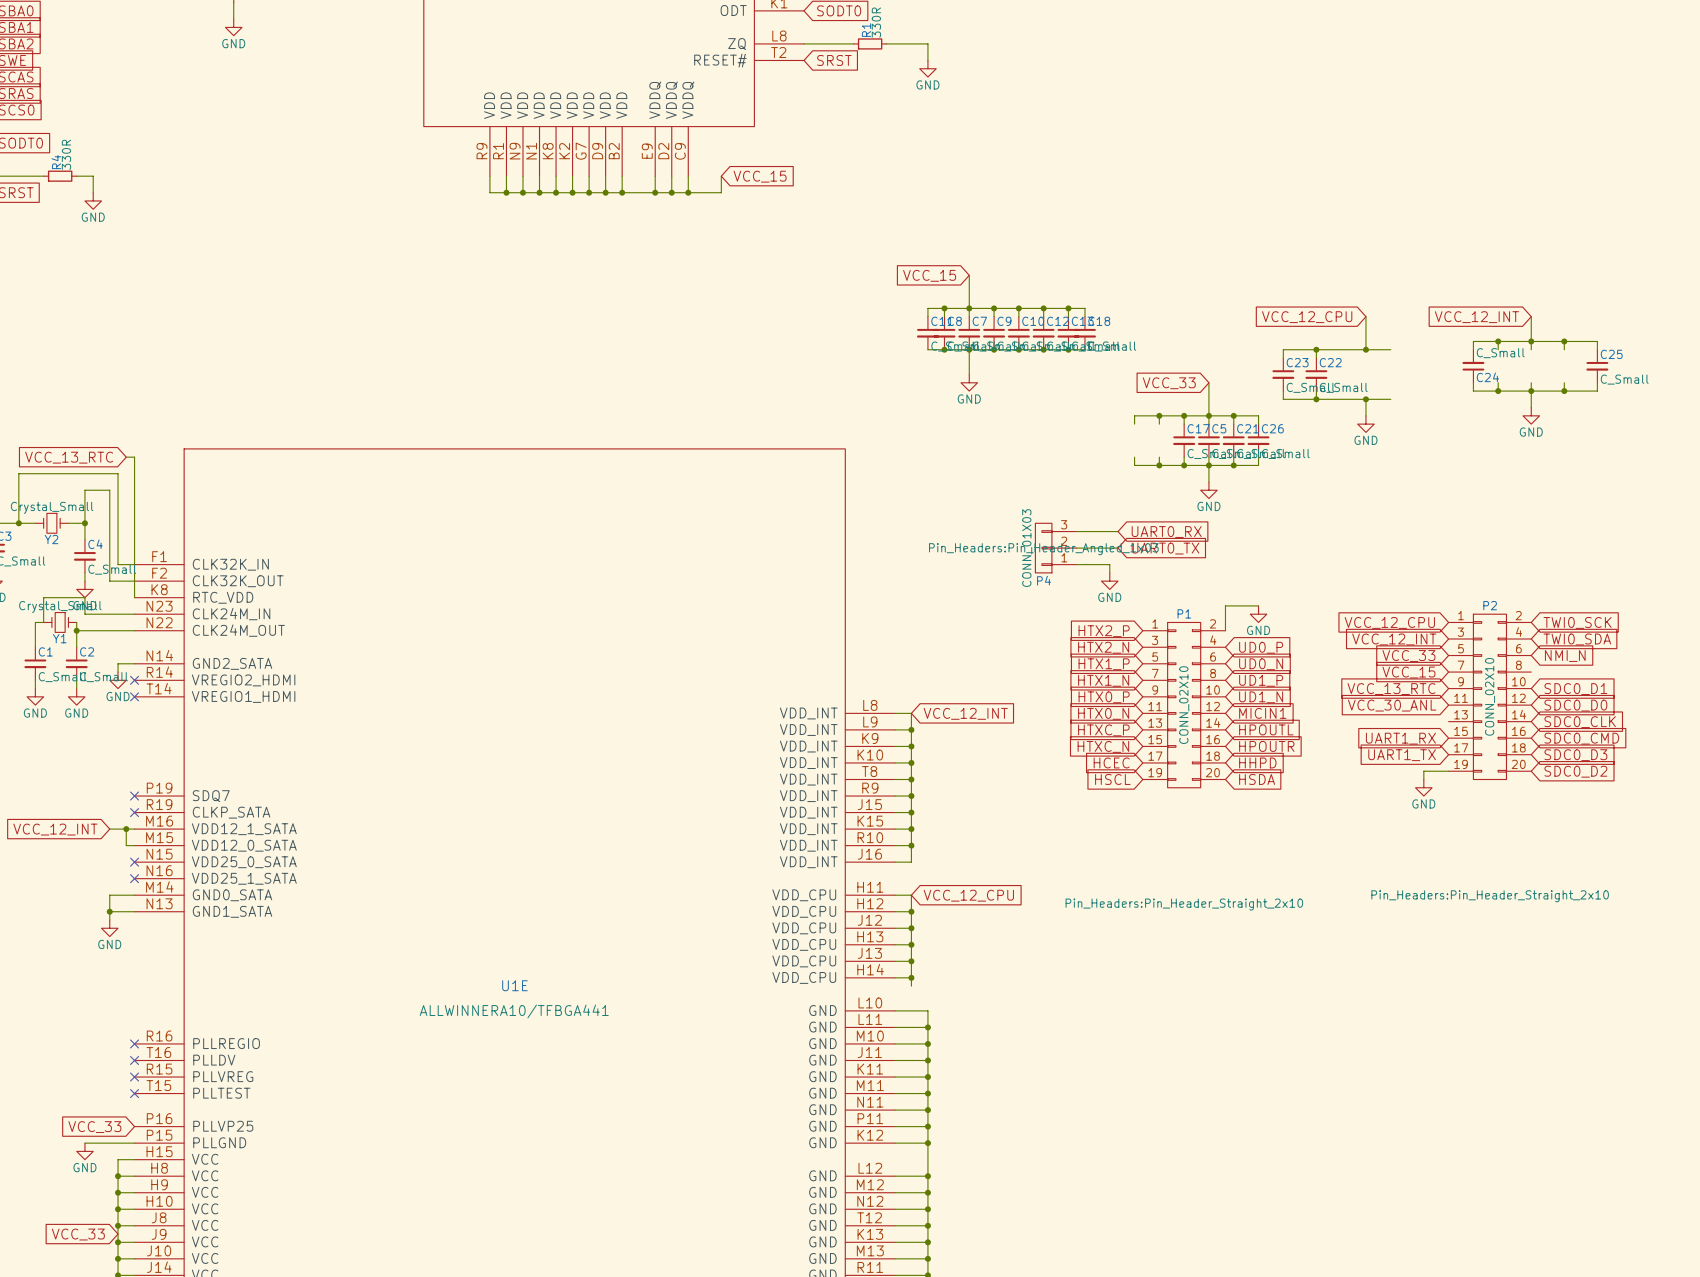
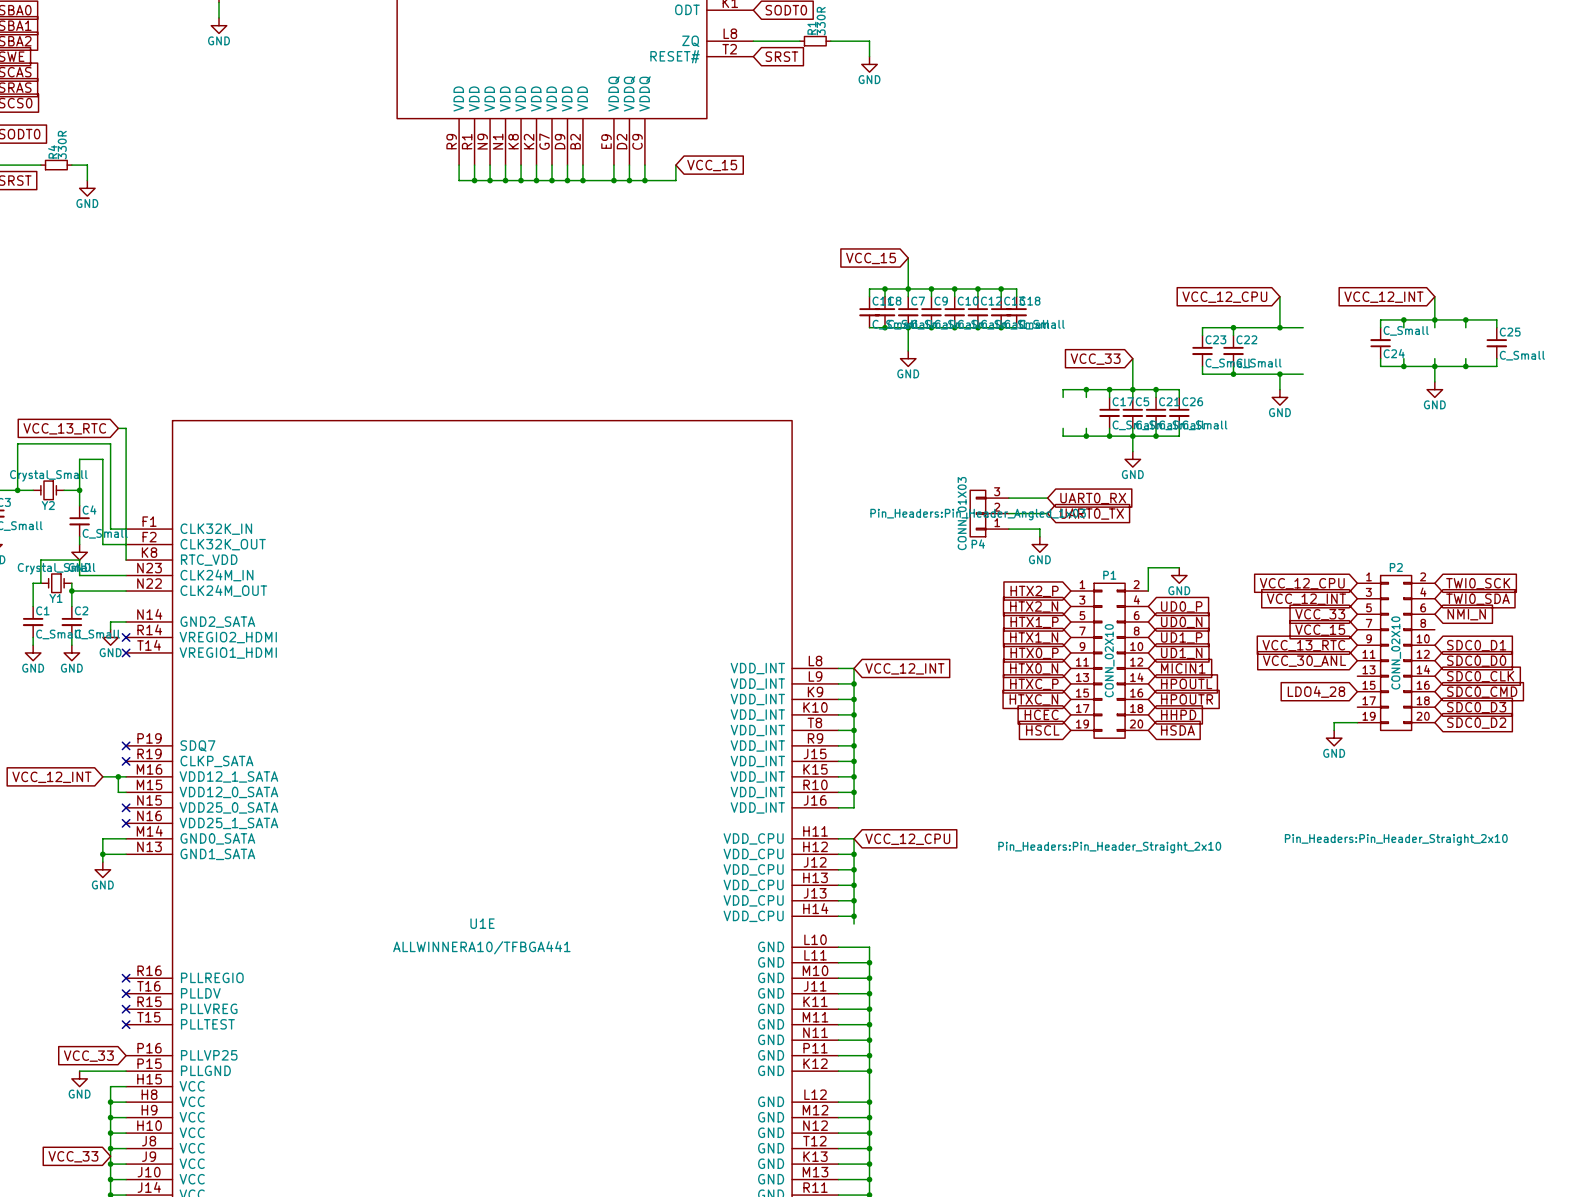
global label: UART1_RX (1400, 738) -> LDO4_28 (1316, 691)
global label: UART1_TX (1402, 755) -> none

